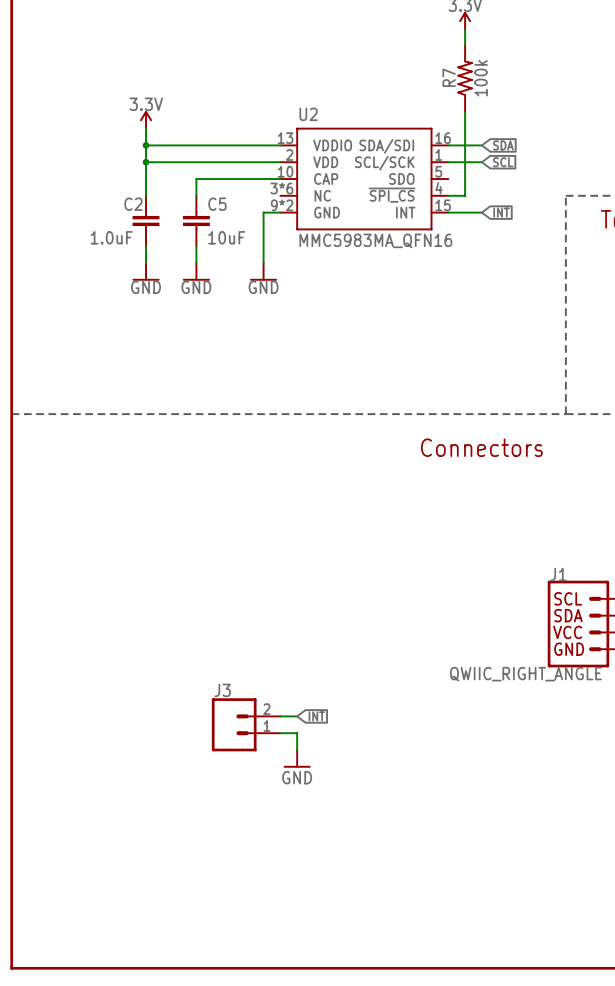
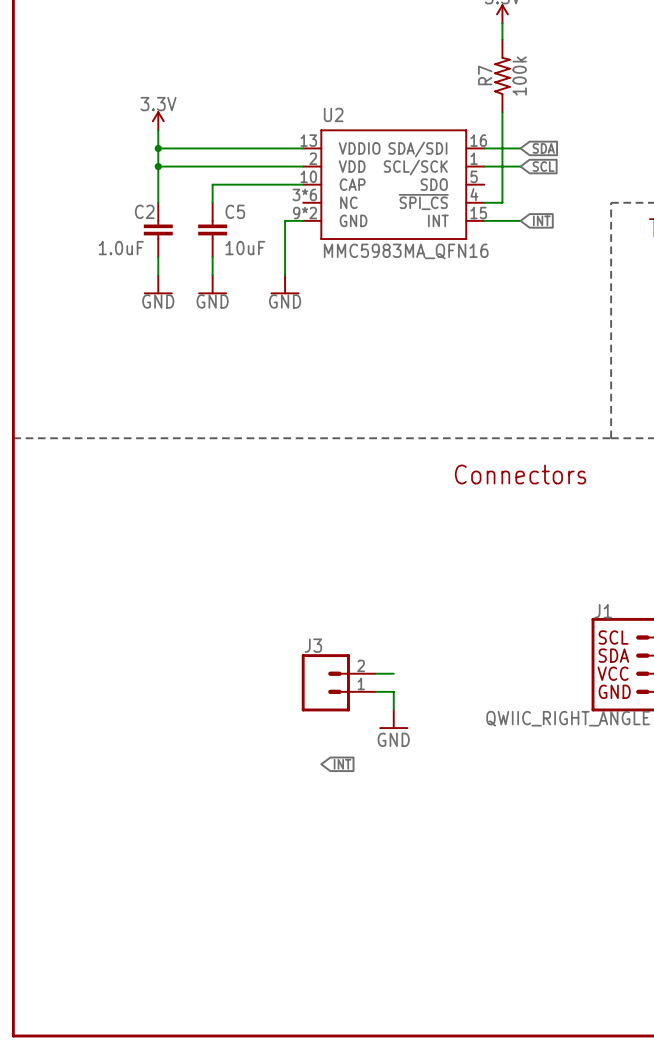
wire: (280, 716) (297, 716) -> (375, 673) (393, 673)
J3 position: (246, 724) -> (338, 682)
wire: (280, 733) (297, 733) (297, 749) -> (375, 691) (393, 691) (393, 709)
power symbol position: GND (297, 758) -> GND (393, 719)

